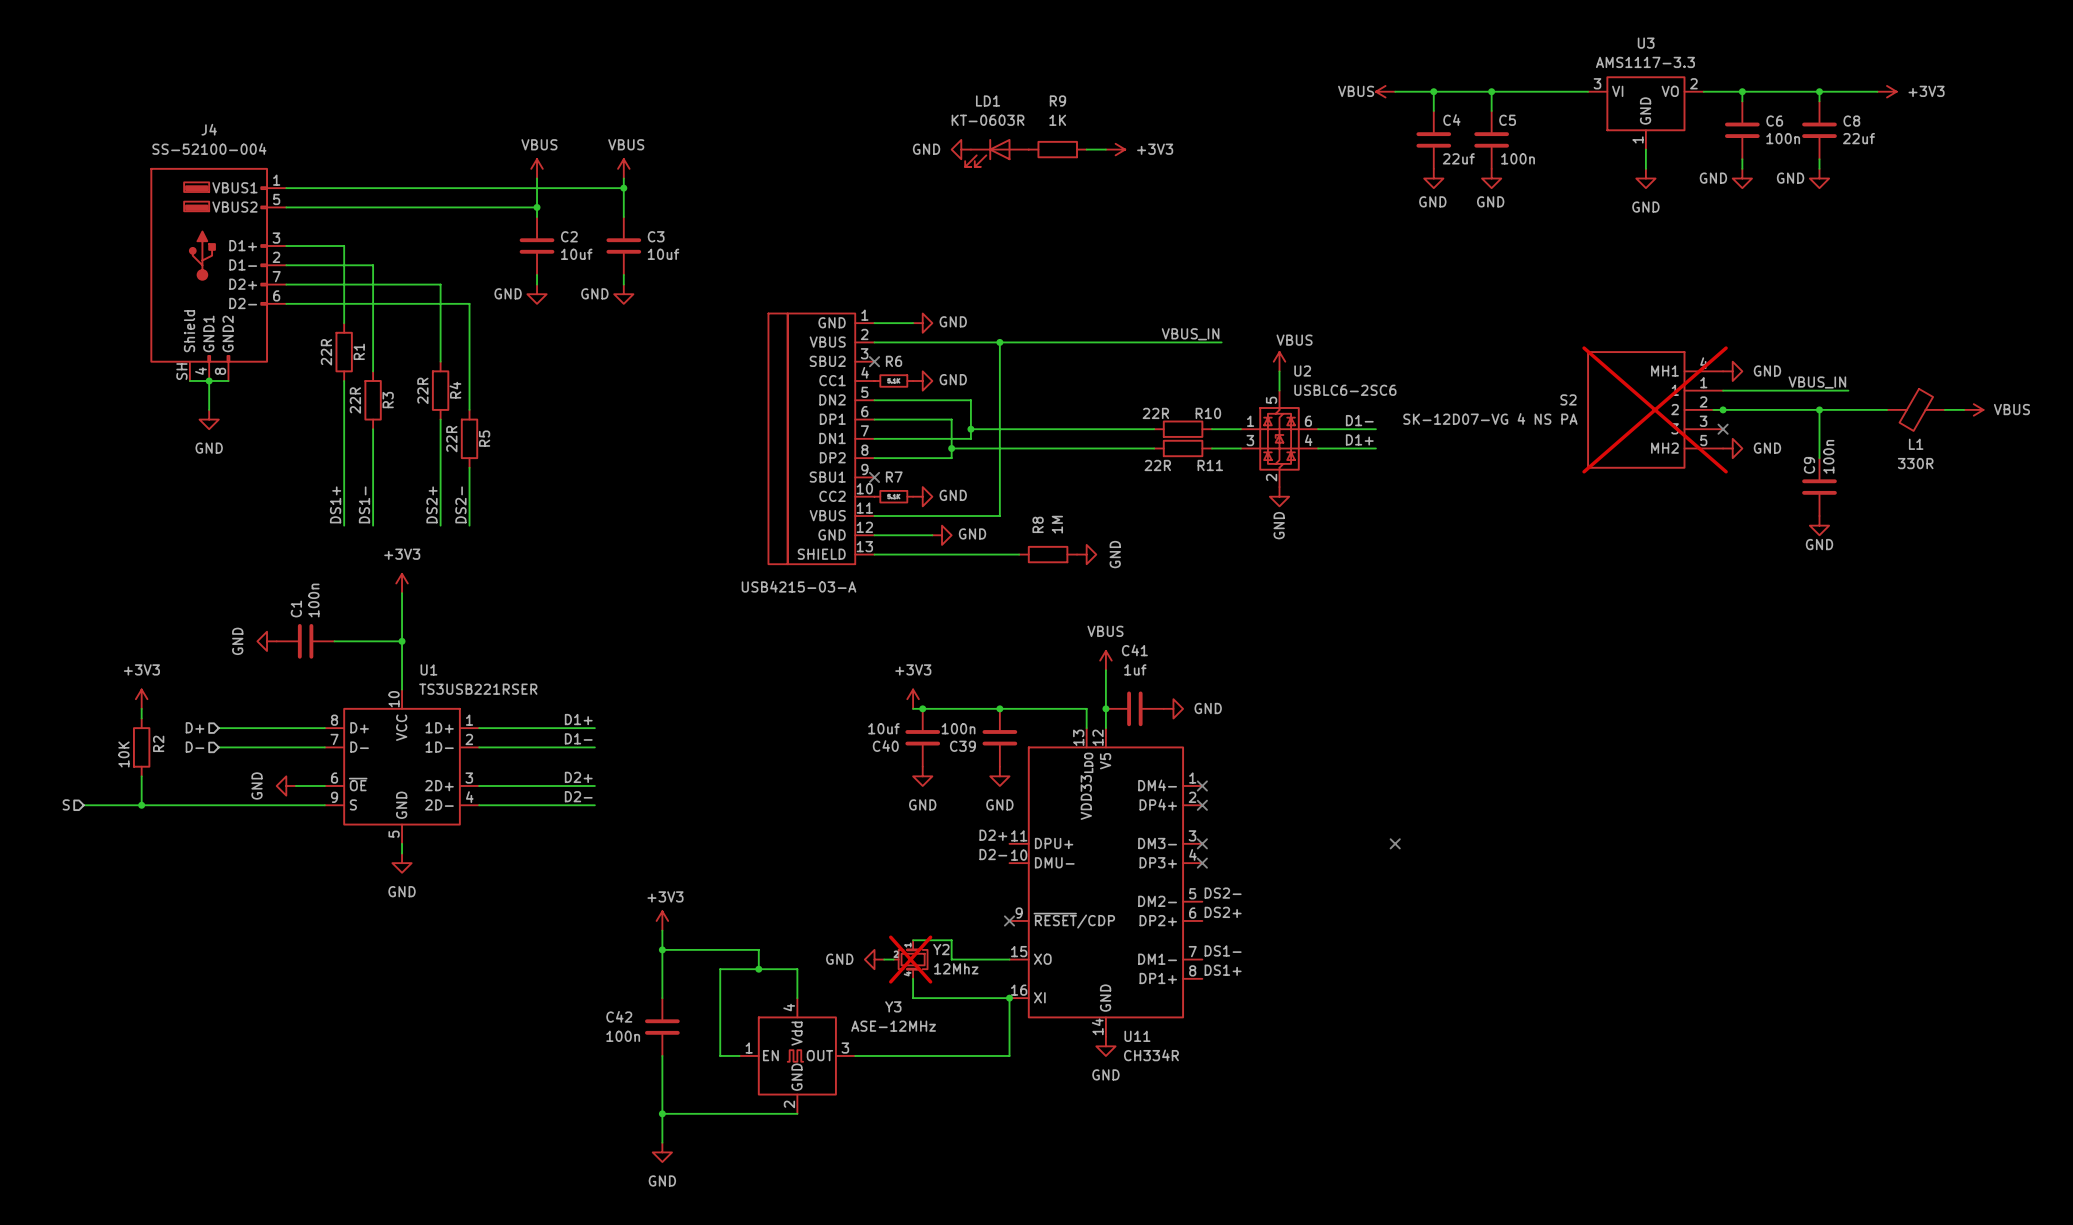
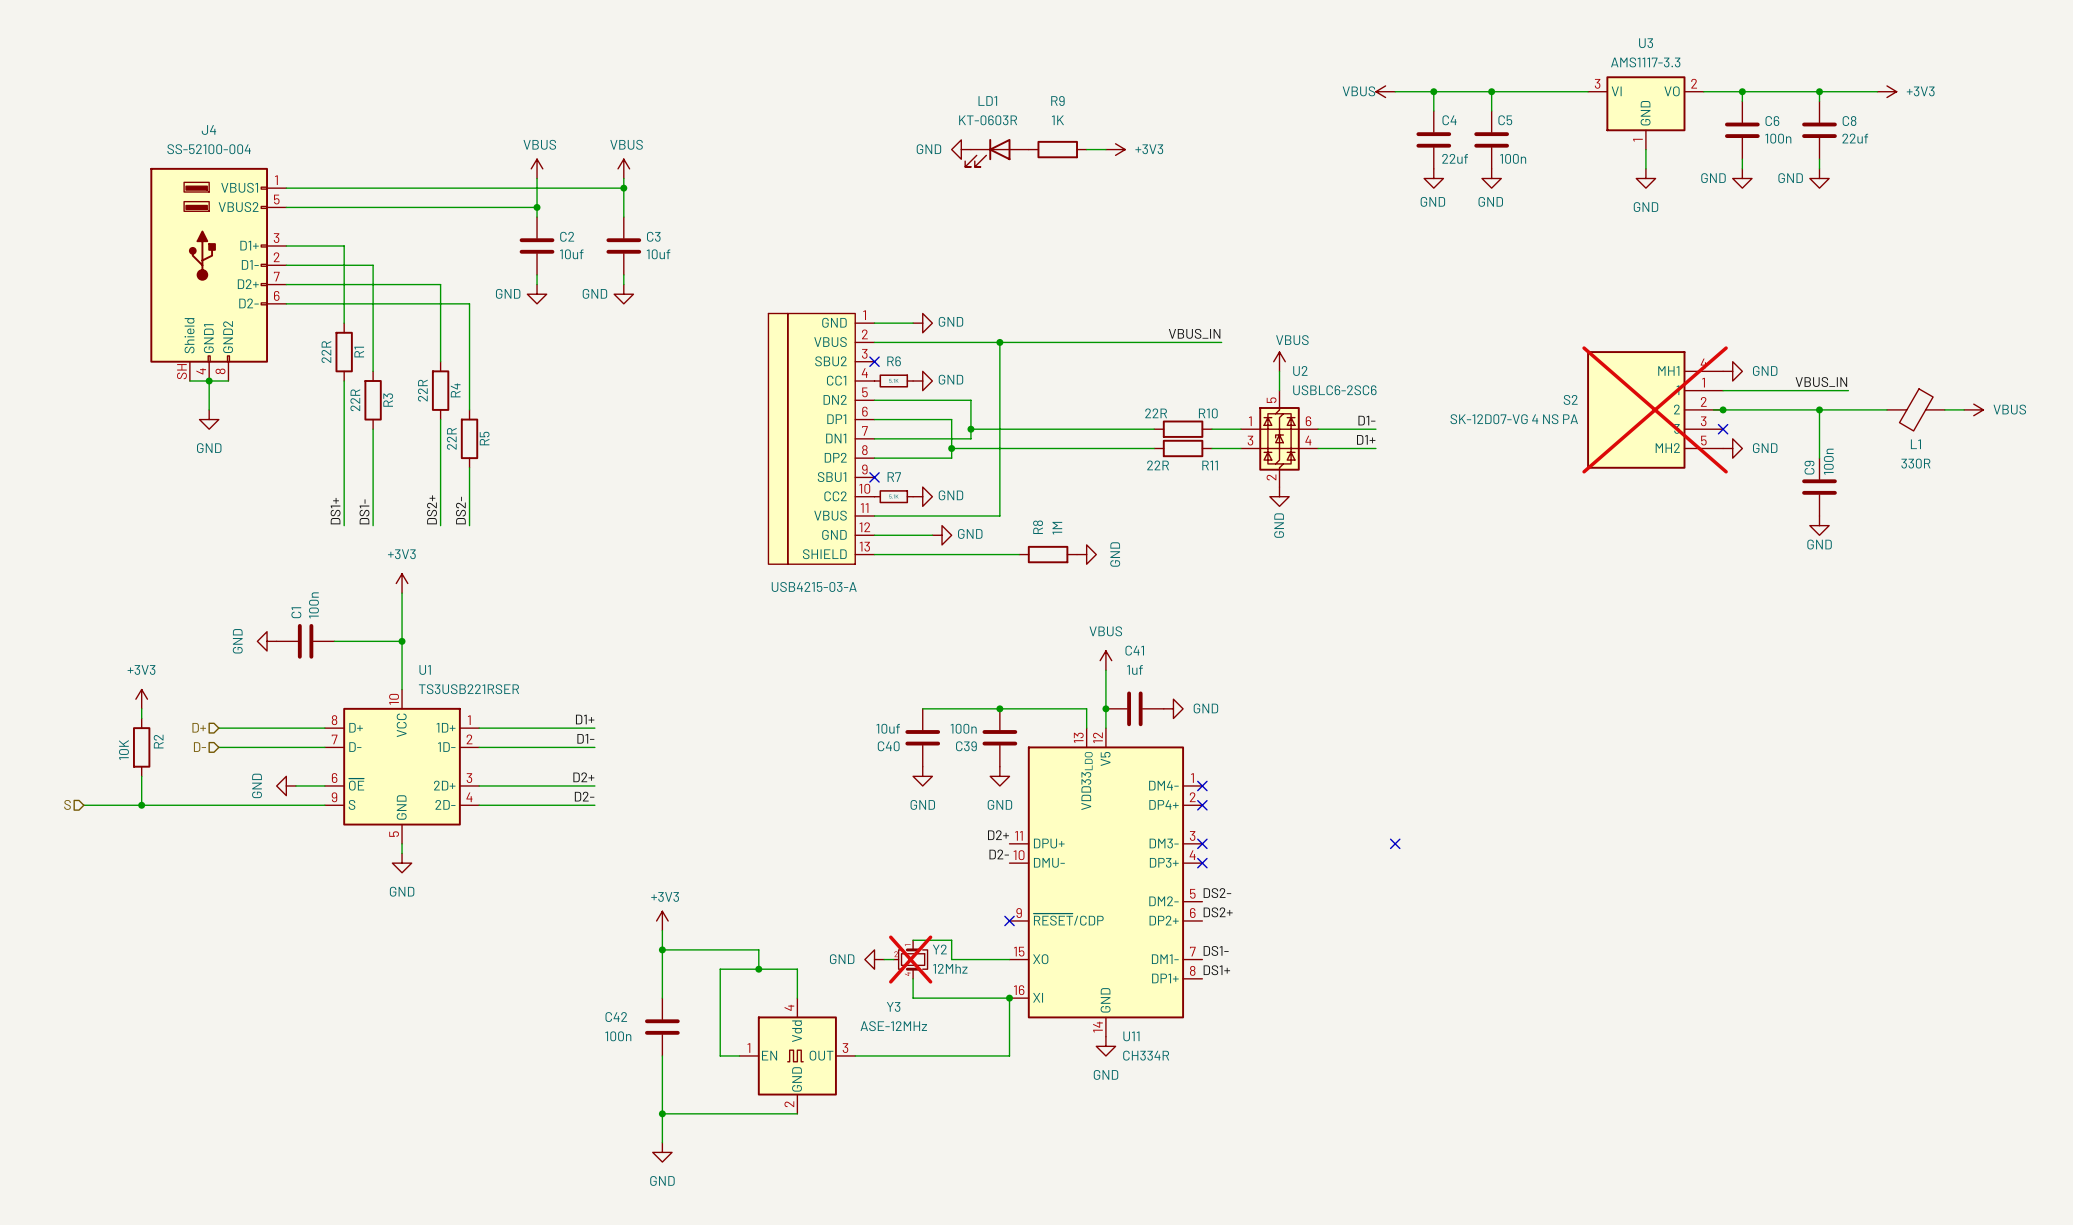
power symbol: +3V3 (913, 699) -> none
wire: (913, 708) (922, 708) -> none
junction: (922, 708) -> none

